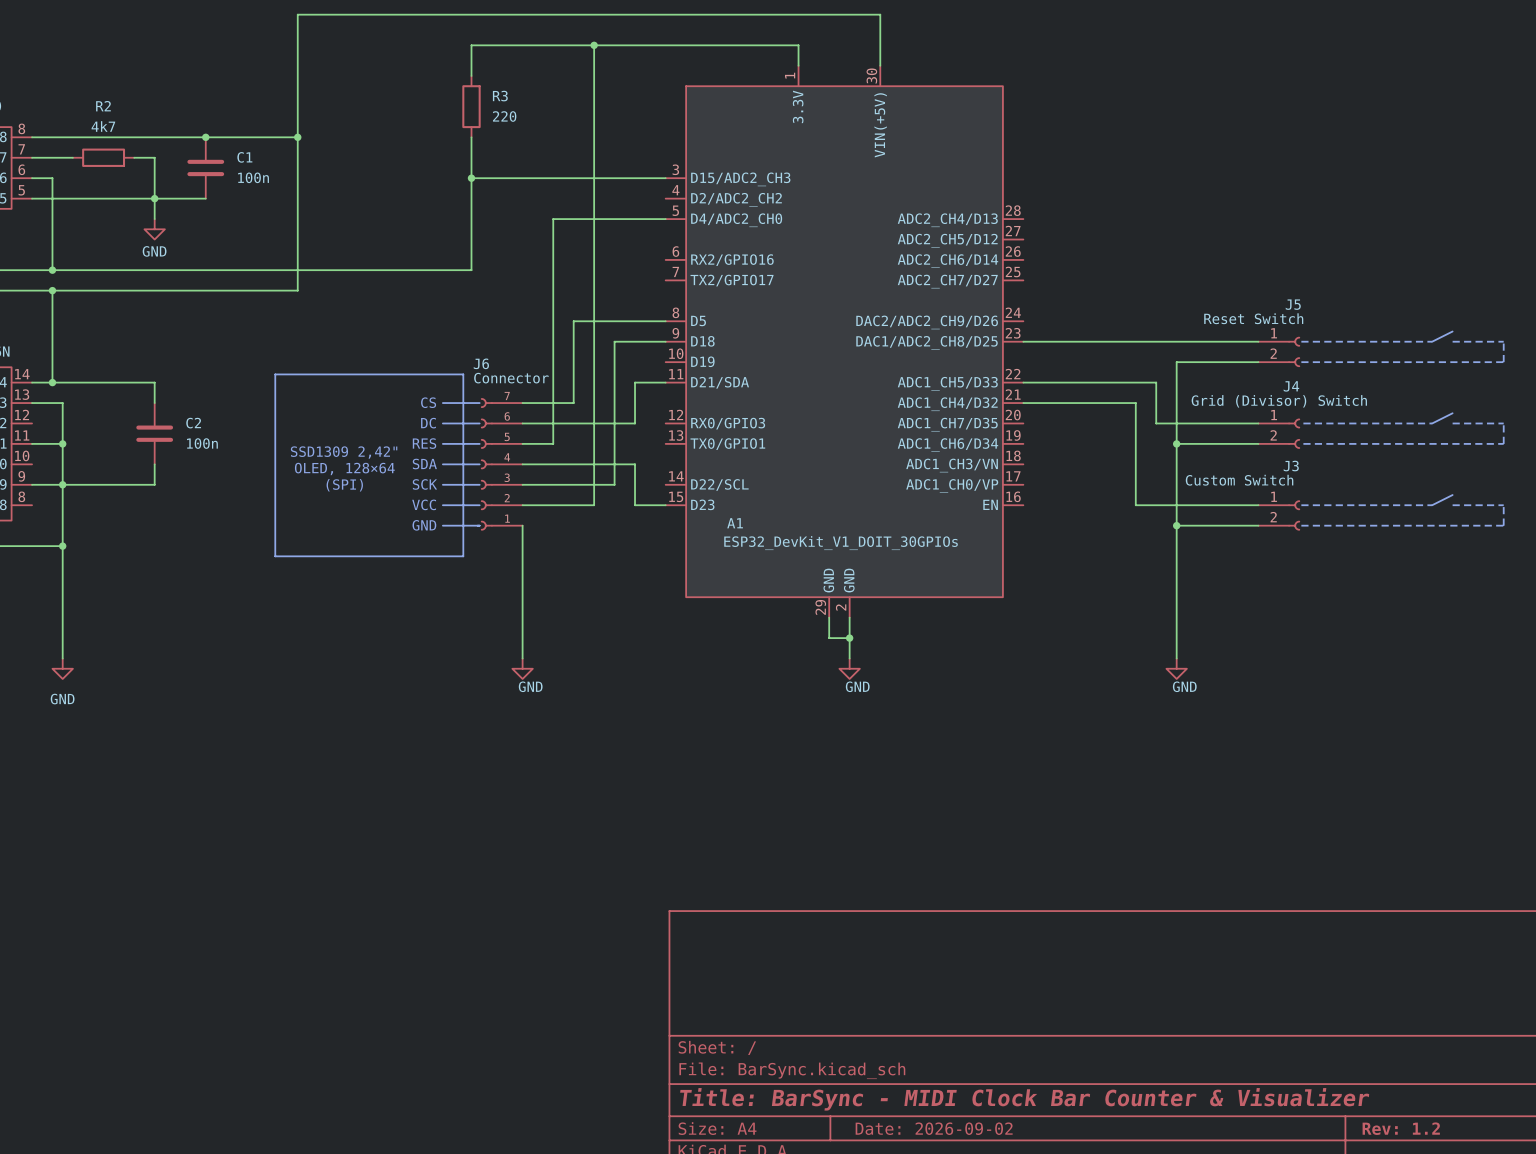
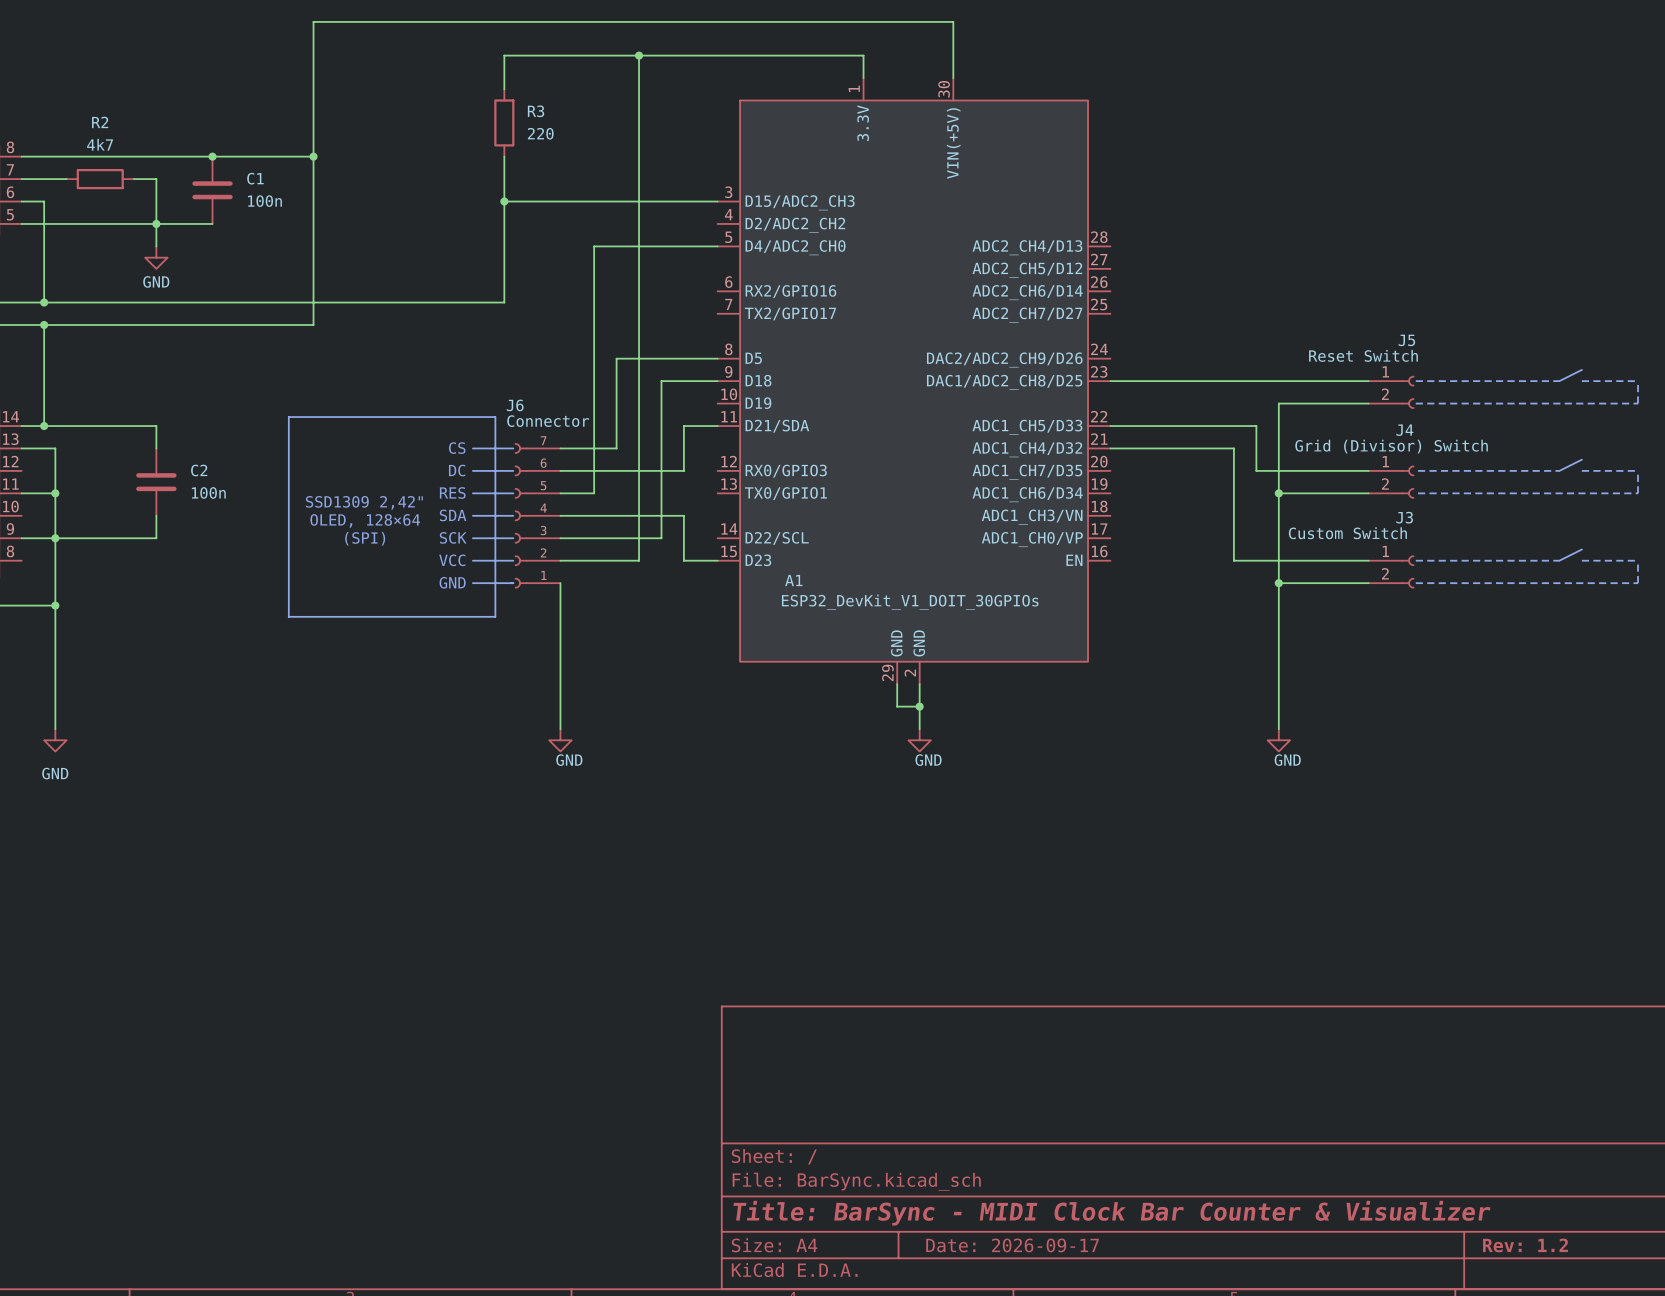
title block: Date: 2026-09-02 (934, 1128) -> Date: 2026-09-17 (1012, 1245)

